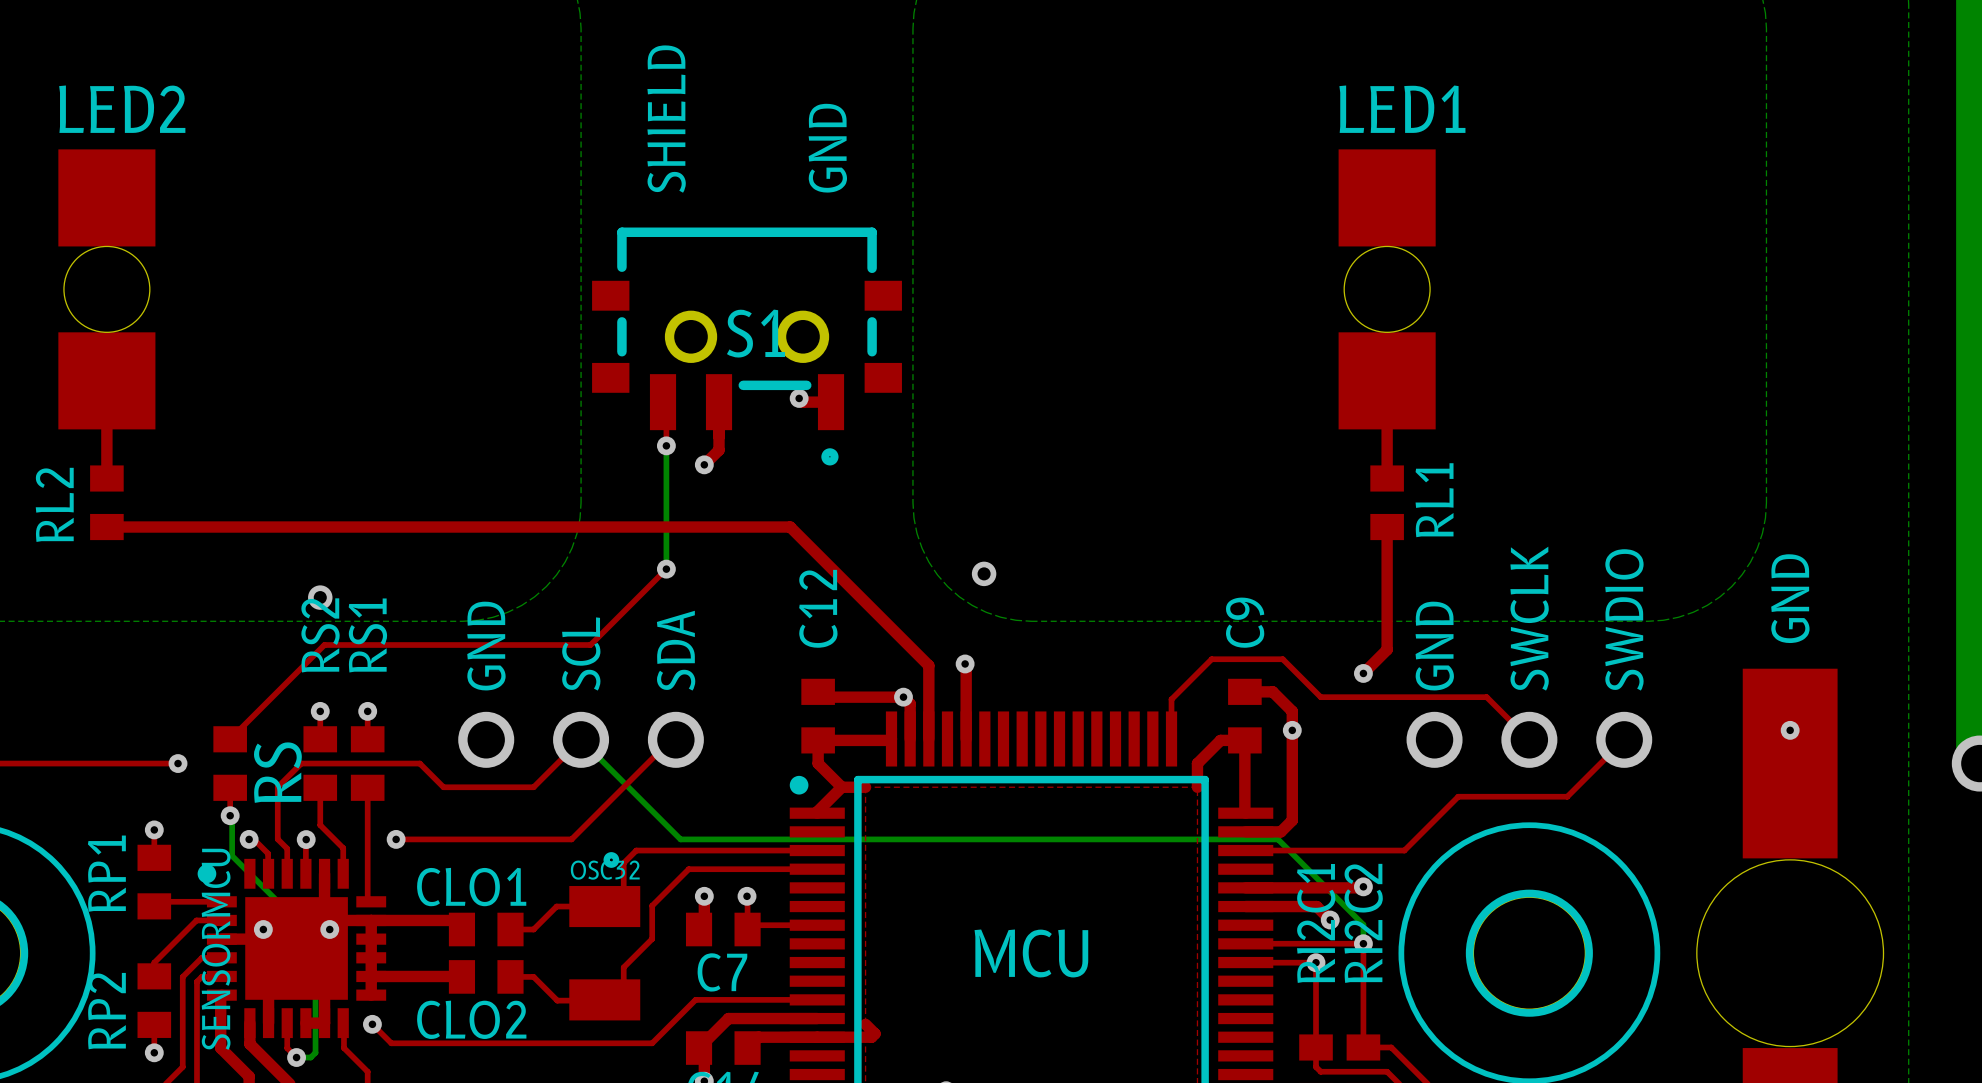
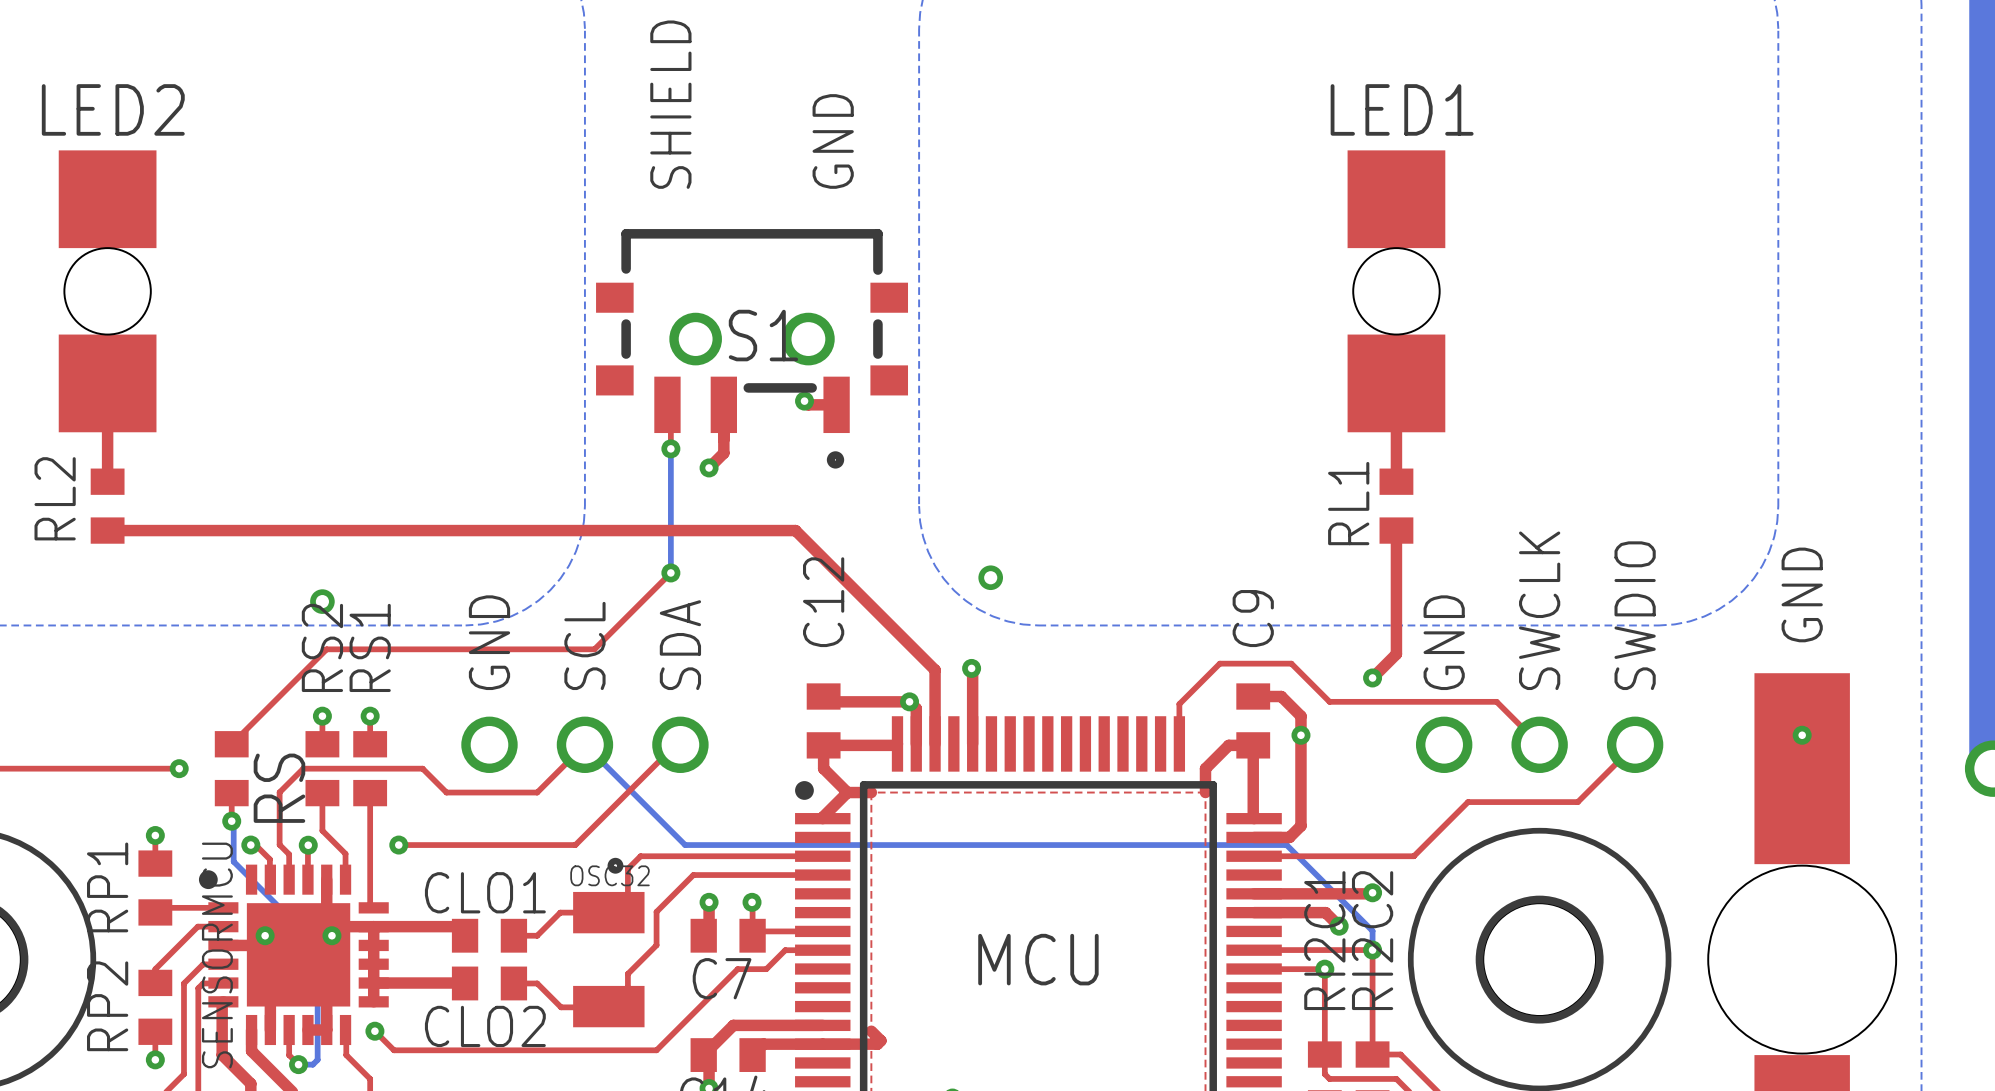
RL1 name position: RL1 (1434, 500) -> RL1 (1348, 503)
top track: (695, 999) (817, 999) -> (700, 1006) (737, 969) (766, 969) (785, 950) (822, 950)

